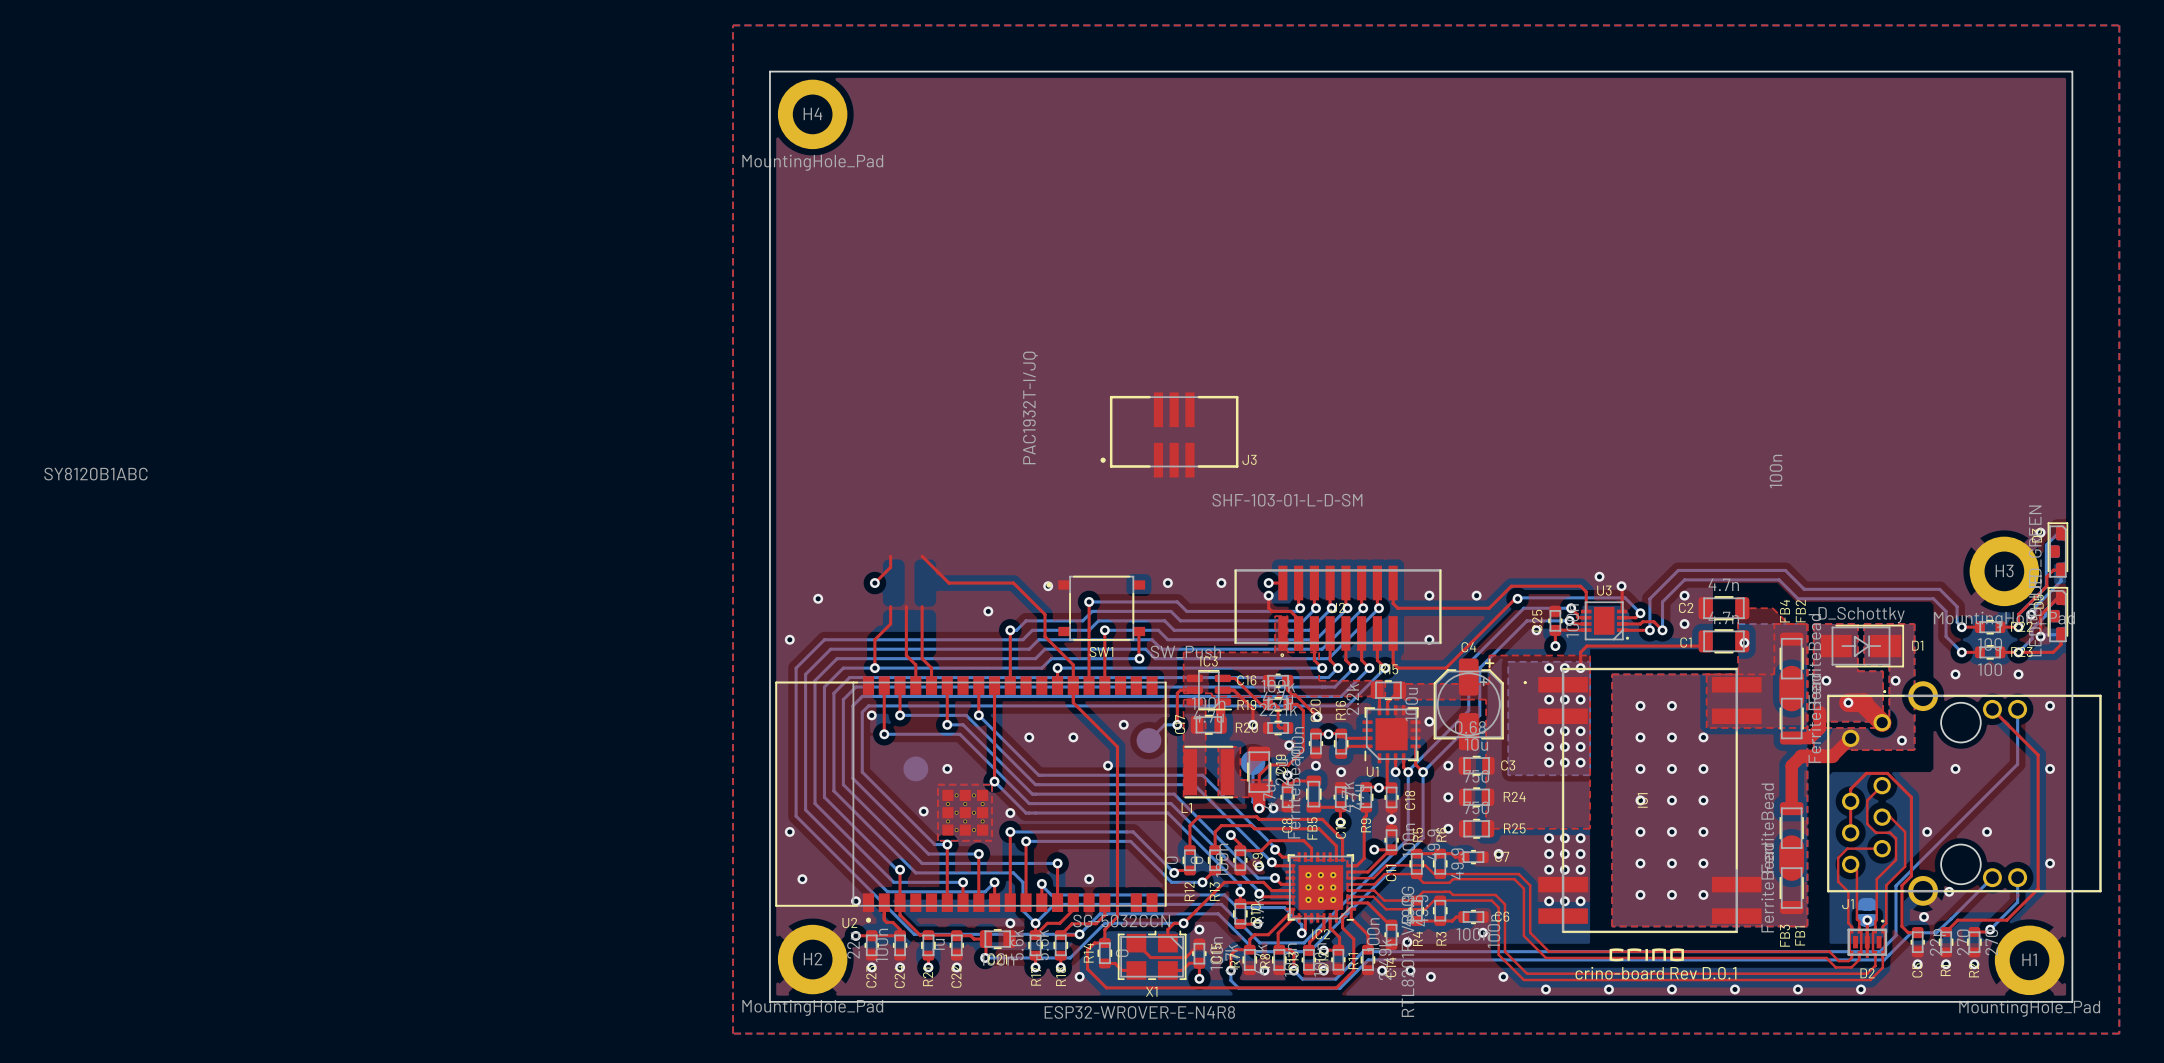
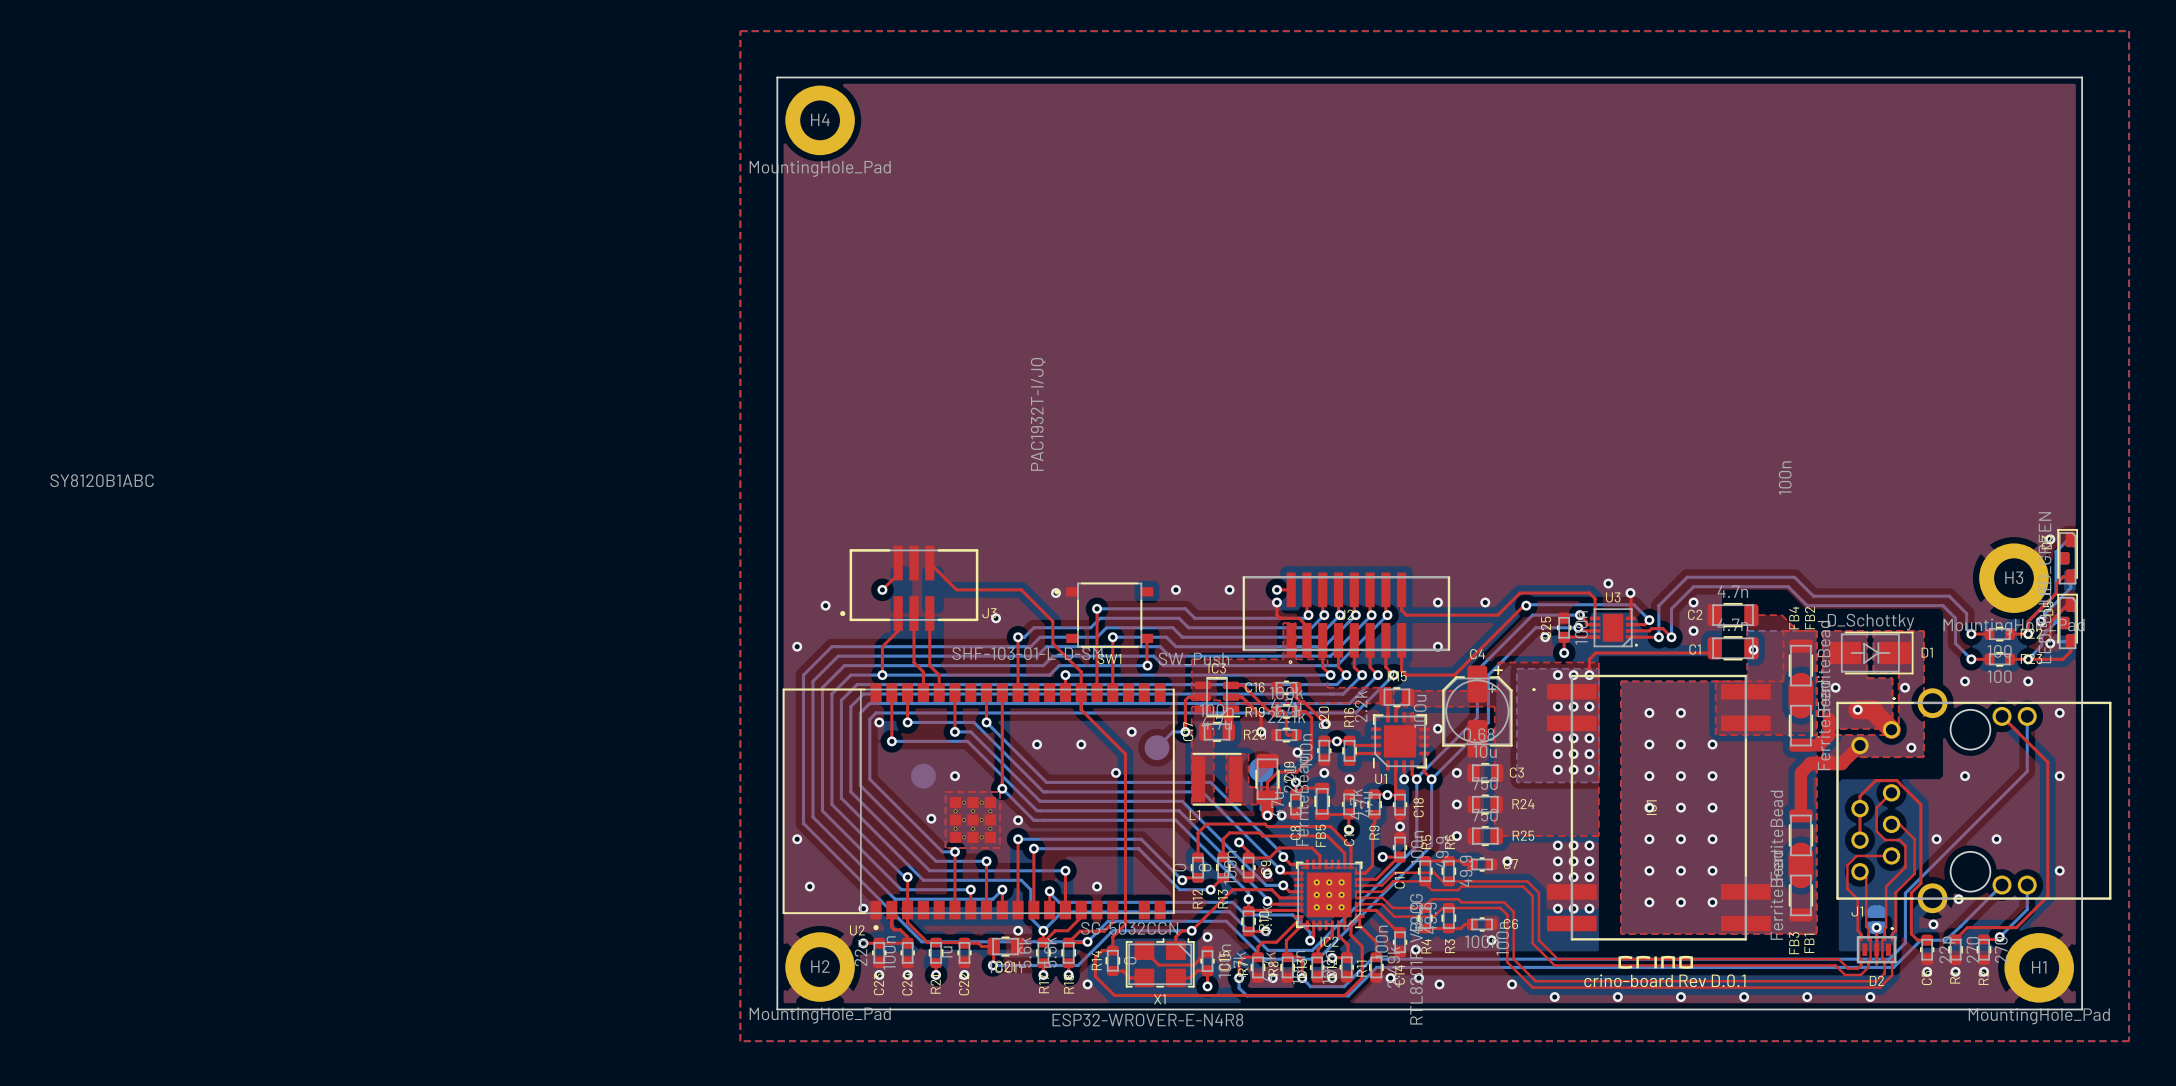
J3 position: (1169, 434) -> (909, 588)

